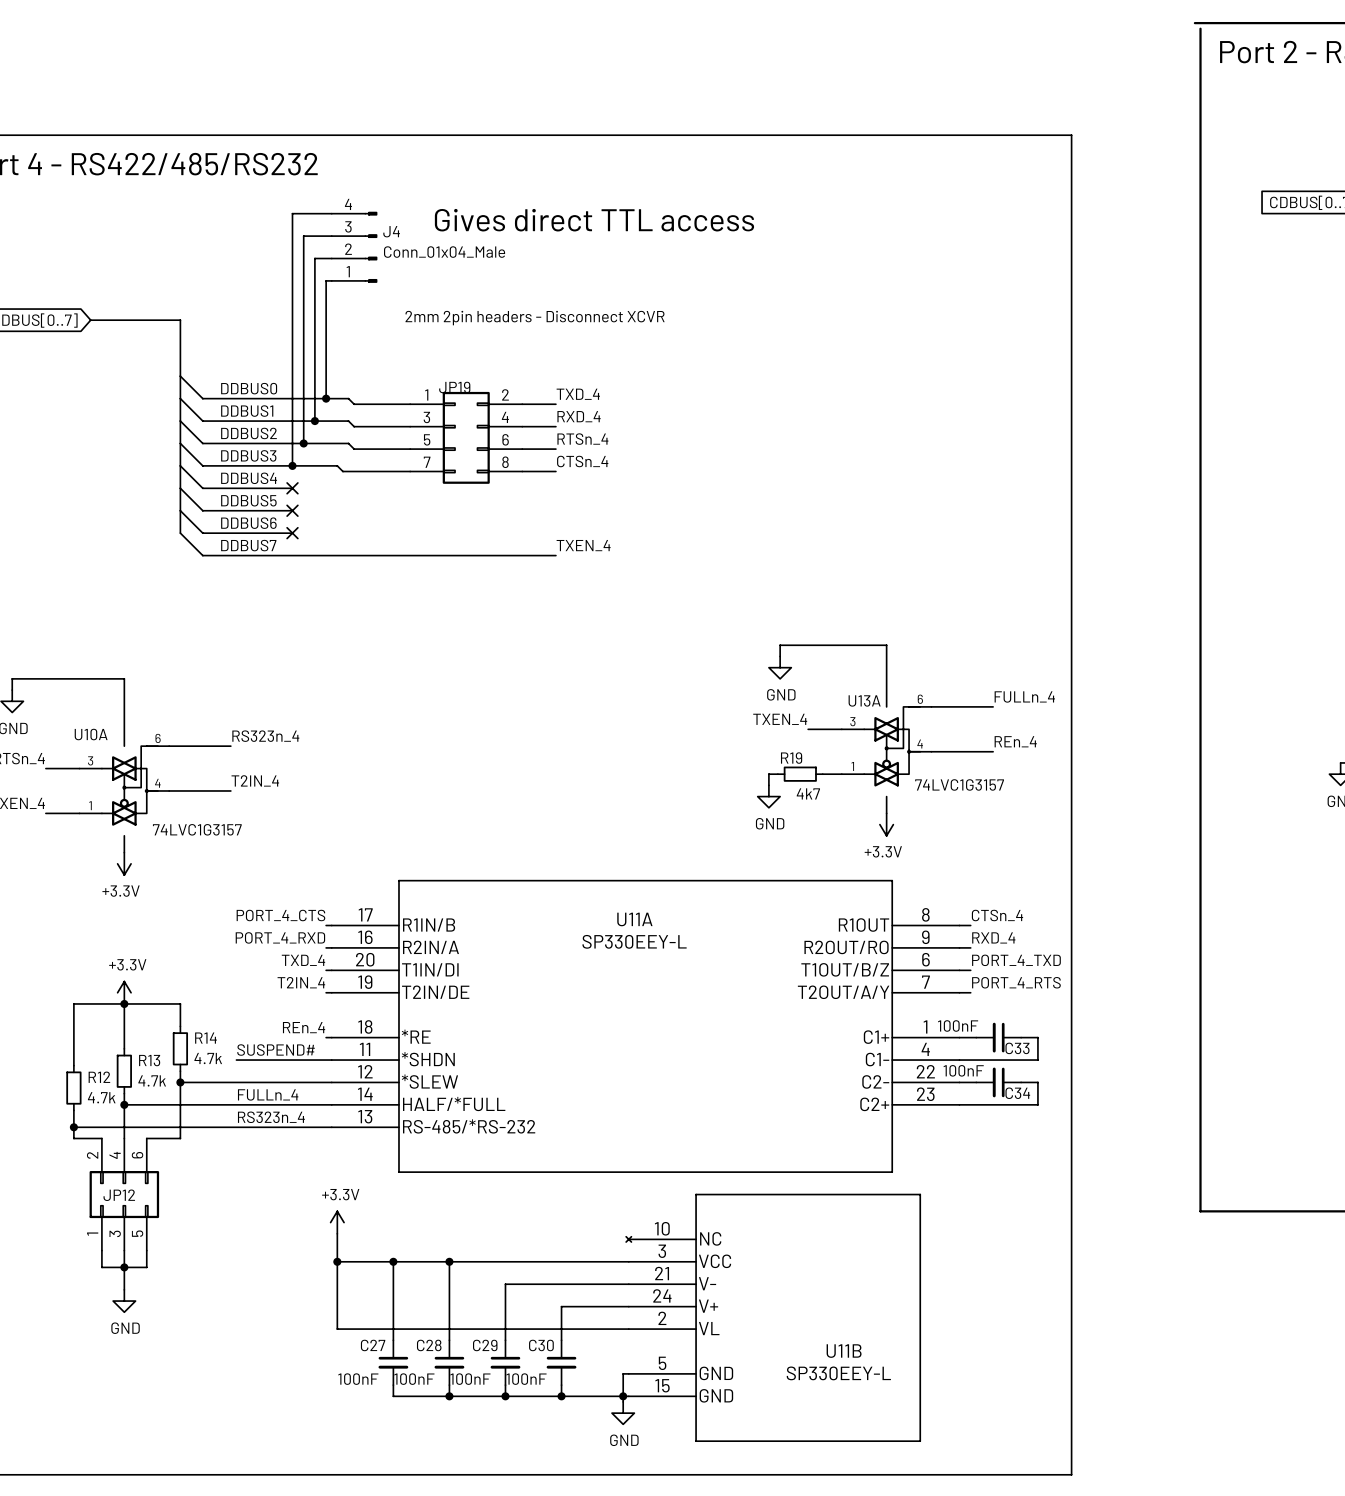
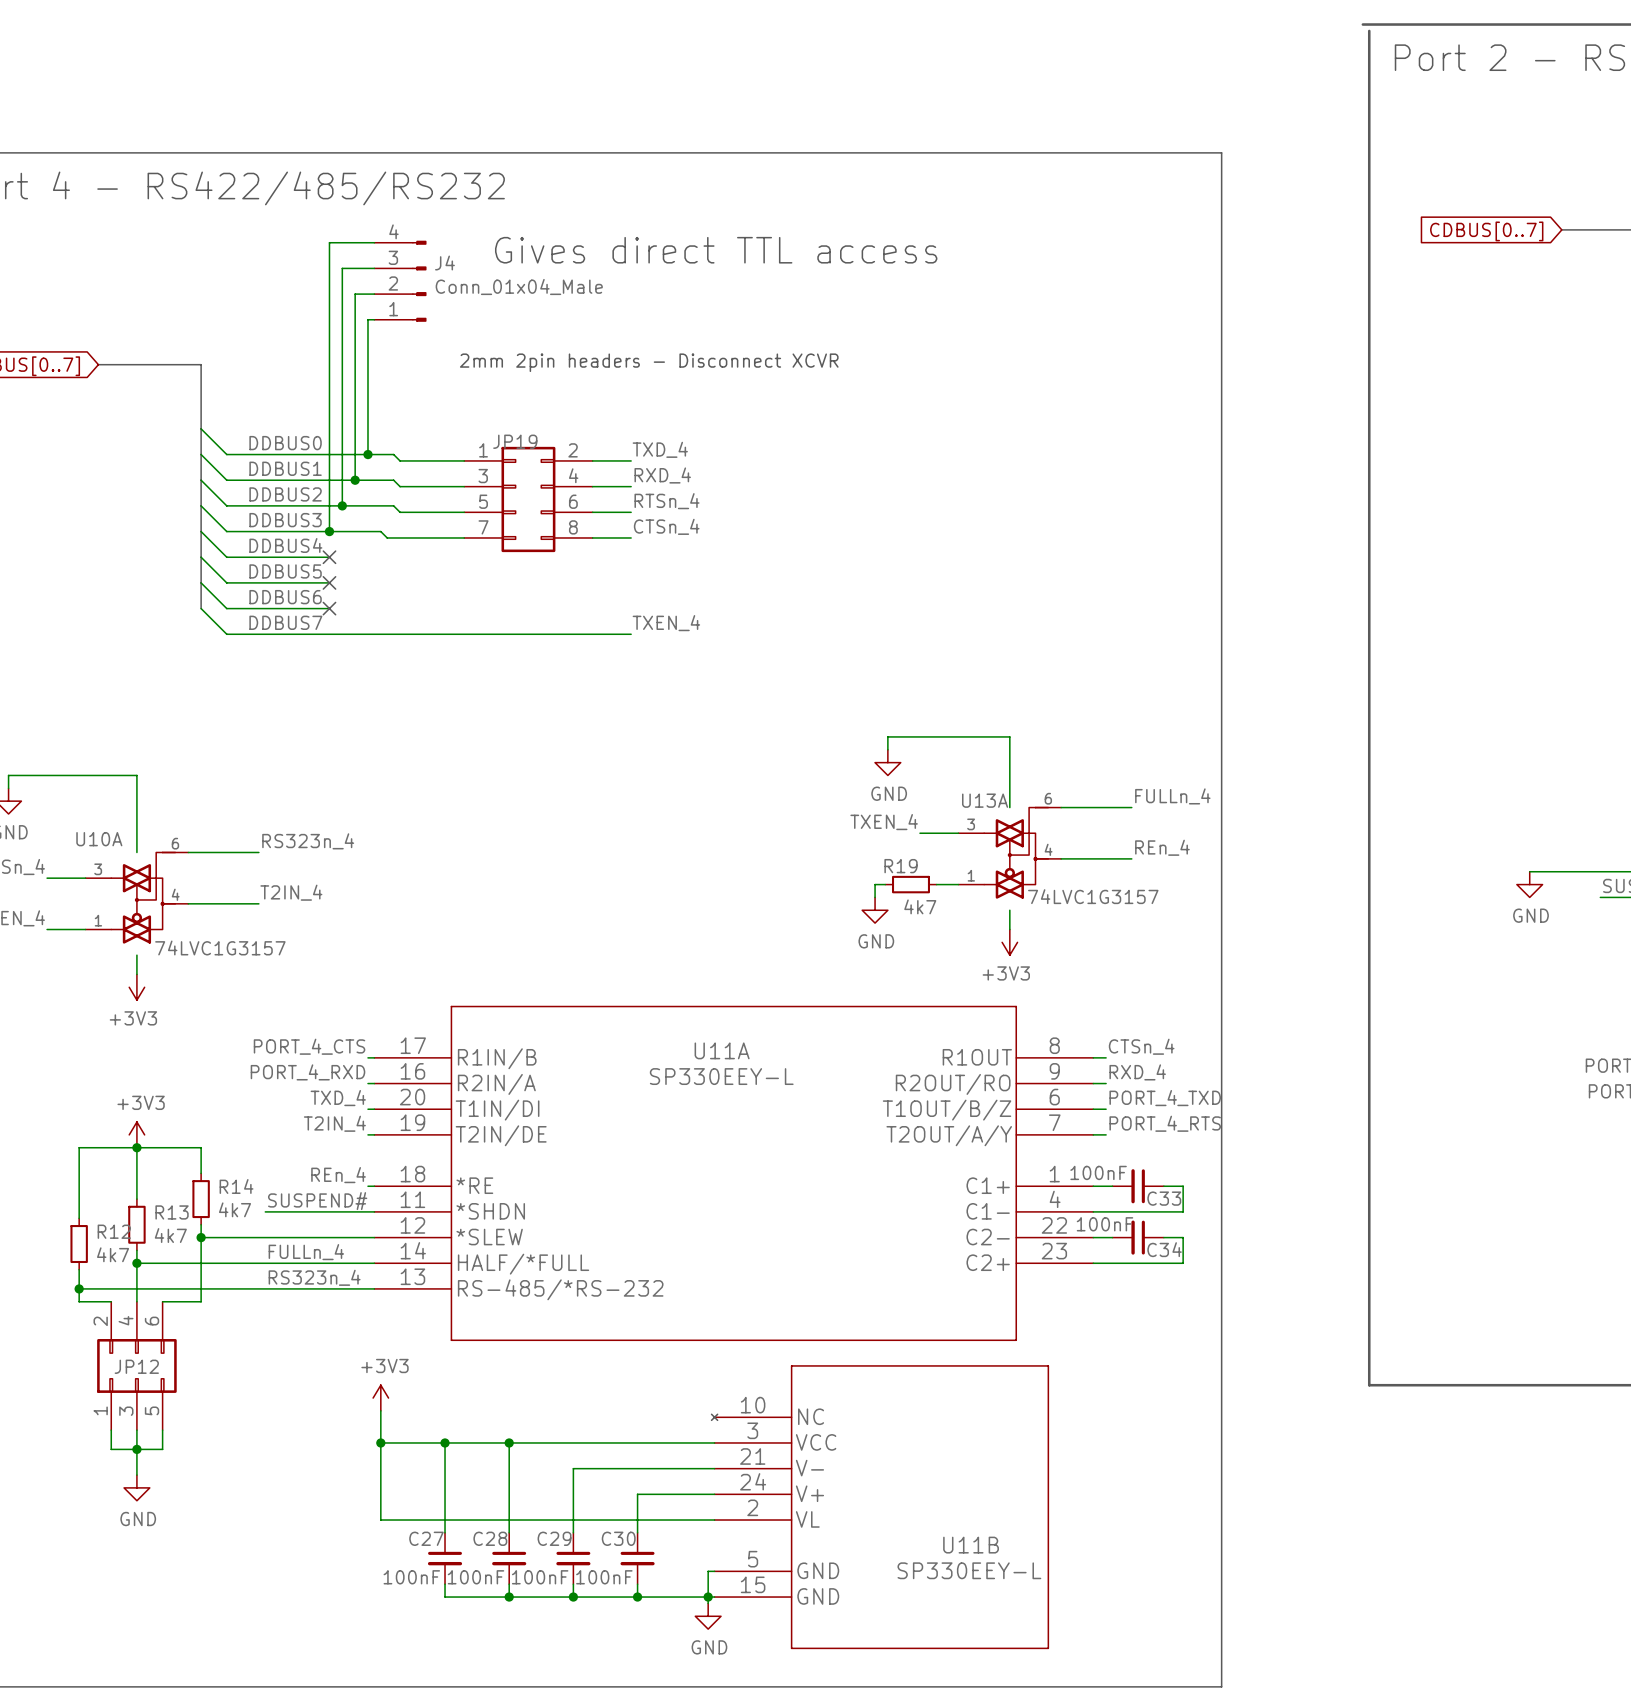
power symbol: +3.3V (886, 824) -> +3V3 (1009, 942)
power symbol: +3.3V (124, 863) -> +3V3 (136, 987)
power symbol: +3.3V (124, 992) -> +3V3 (136, 1134)
R14 value: 4.7k (208, 1058) -> 4k7 (235, 1209)
R13 value: 4.7k (152, 1080) -> 4k7 (170, 1235)
R12 value: 4.7k (101, 1097) -> 4k7 (113, 1254)
power symbol: +3.3V (337, 1222) -> +3V3 (380, 1398)

